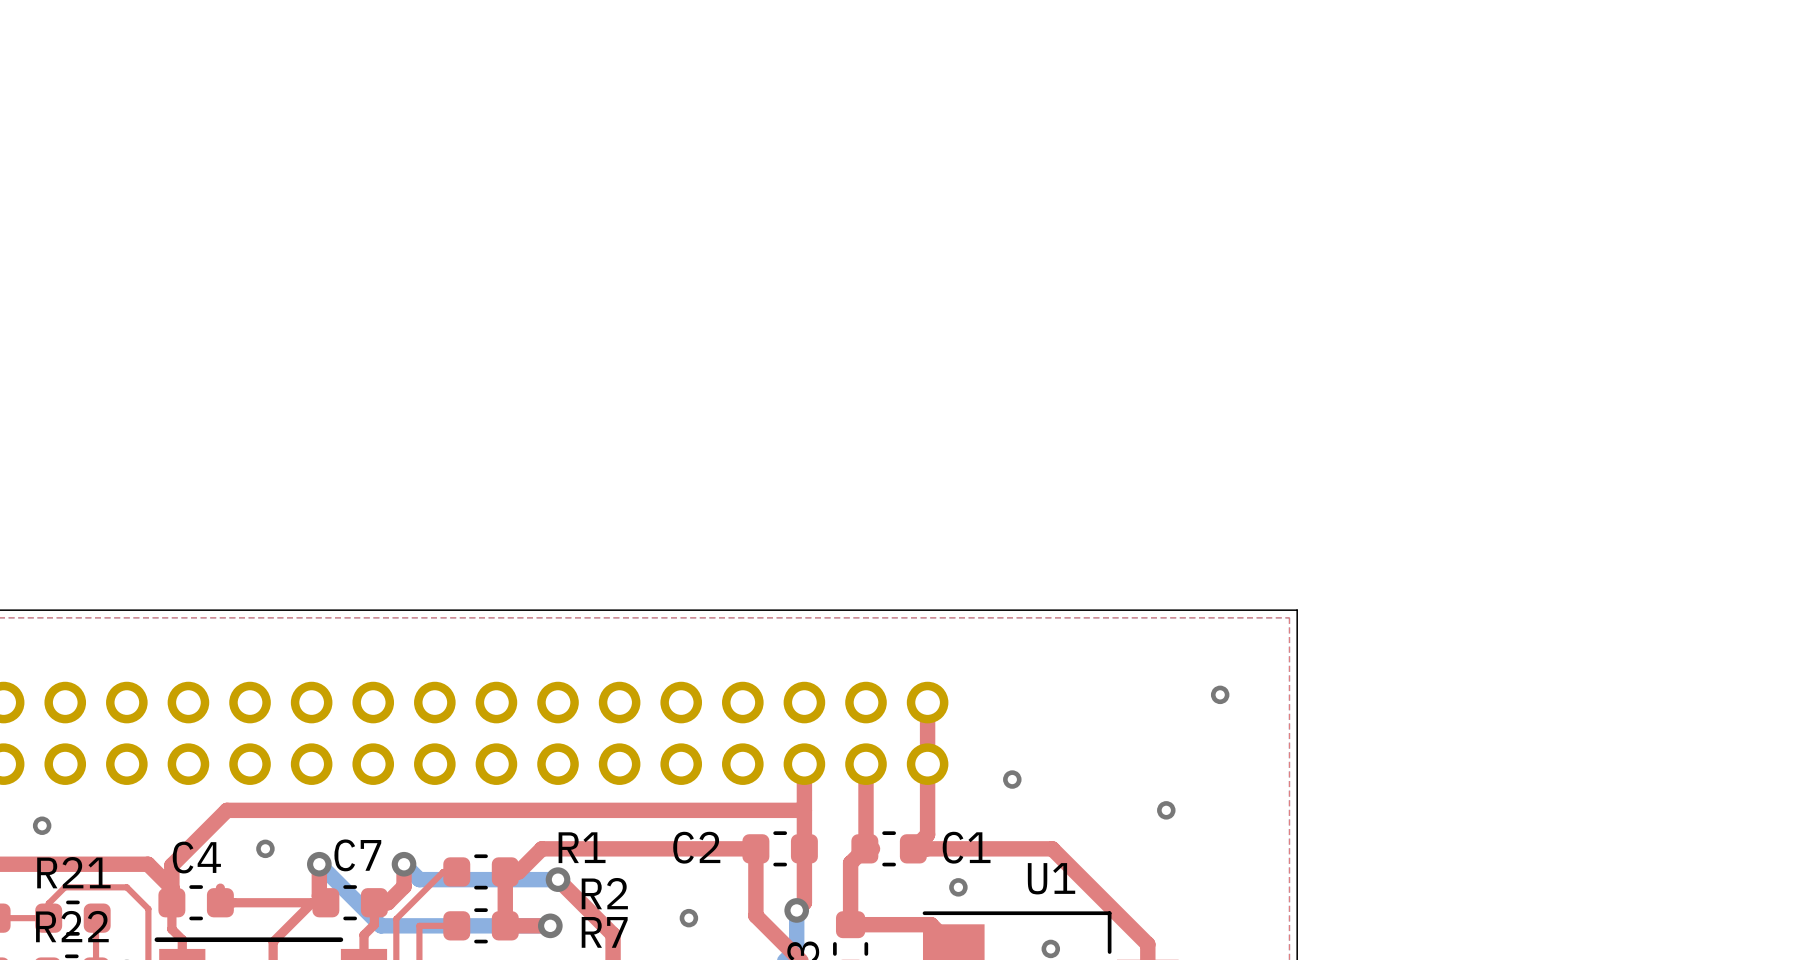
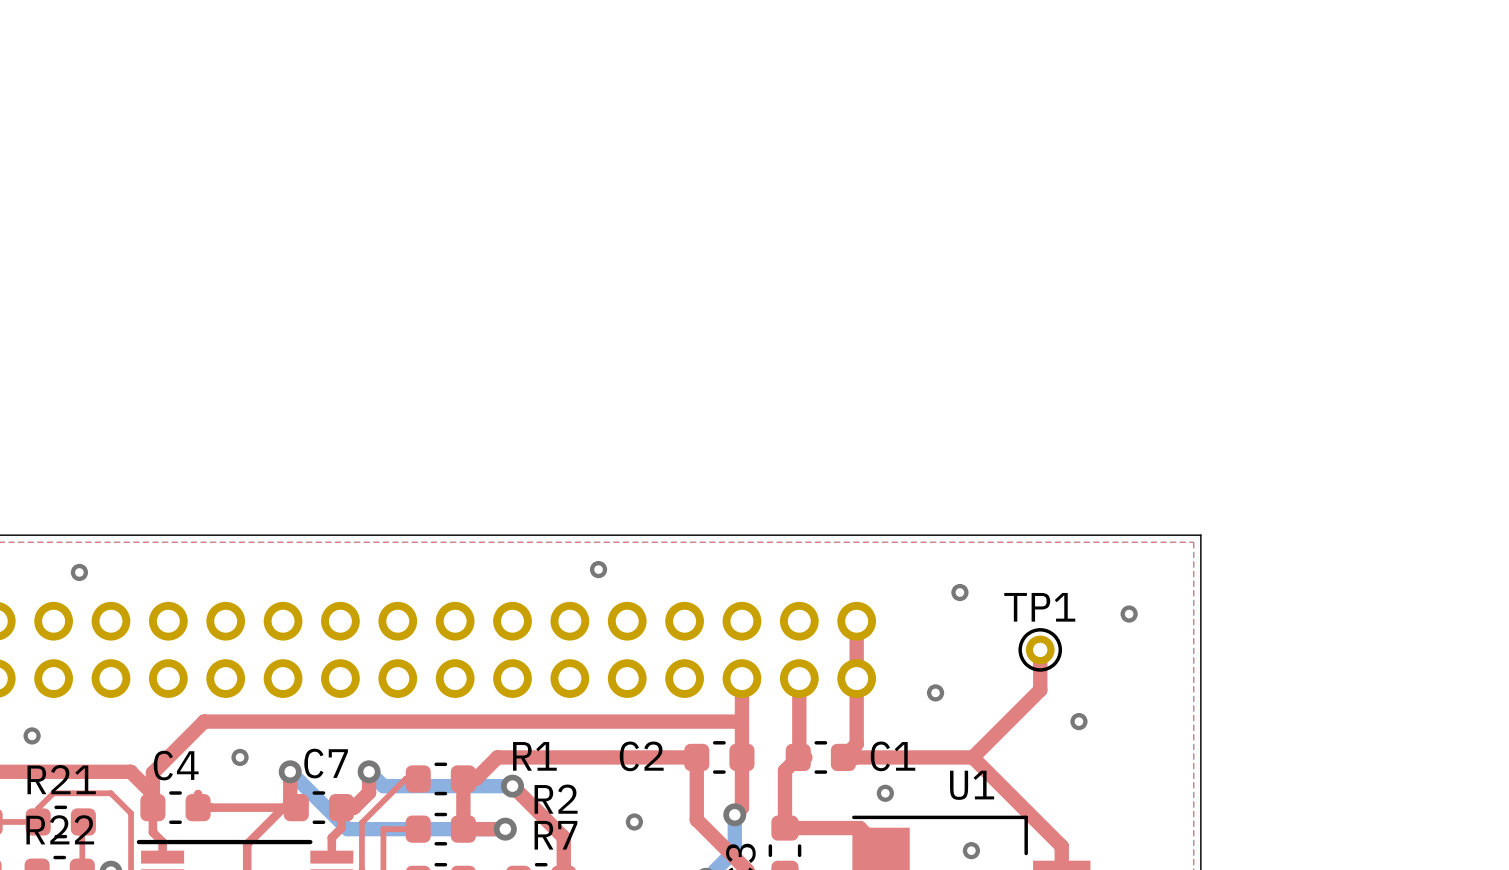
via: none -> (598, 569)
via: none -> (79, 572)
via: none -> (959, 592)
top track: none -> (1040, 649) (1040, 690) (972, 757)
TP1: none -> (1040, 649)

